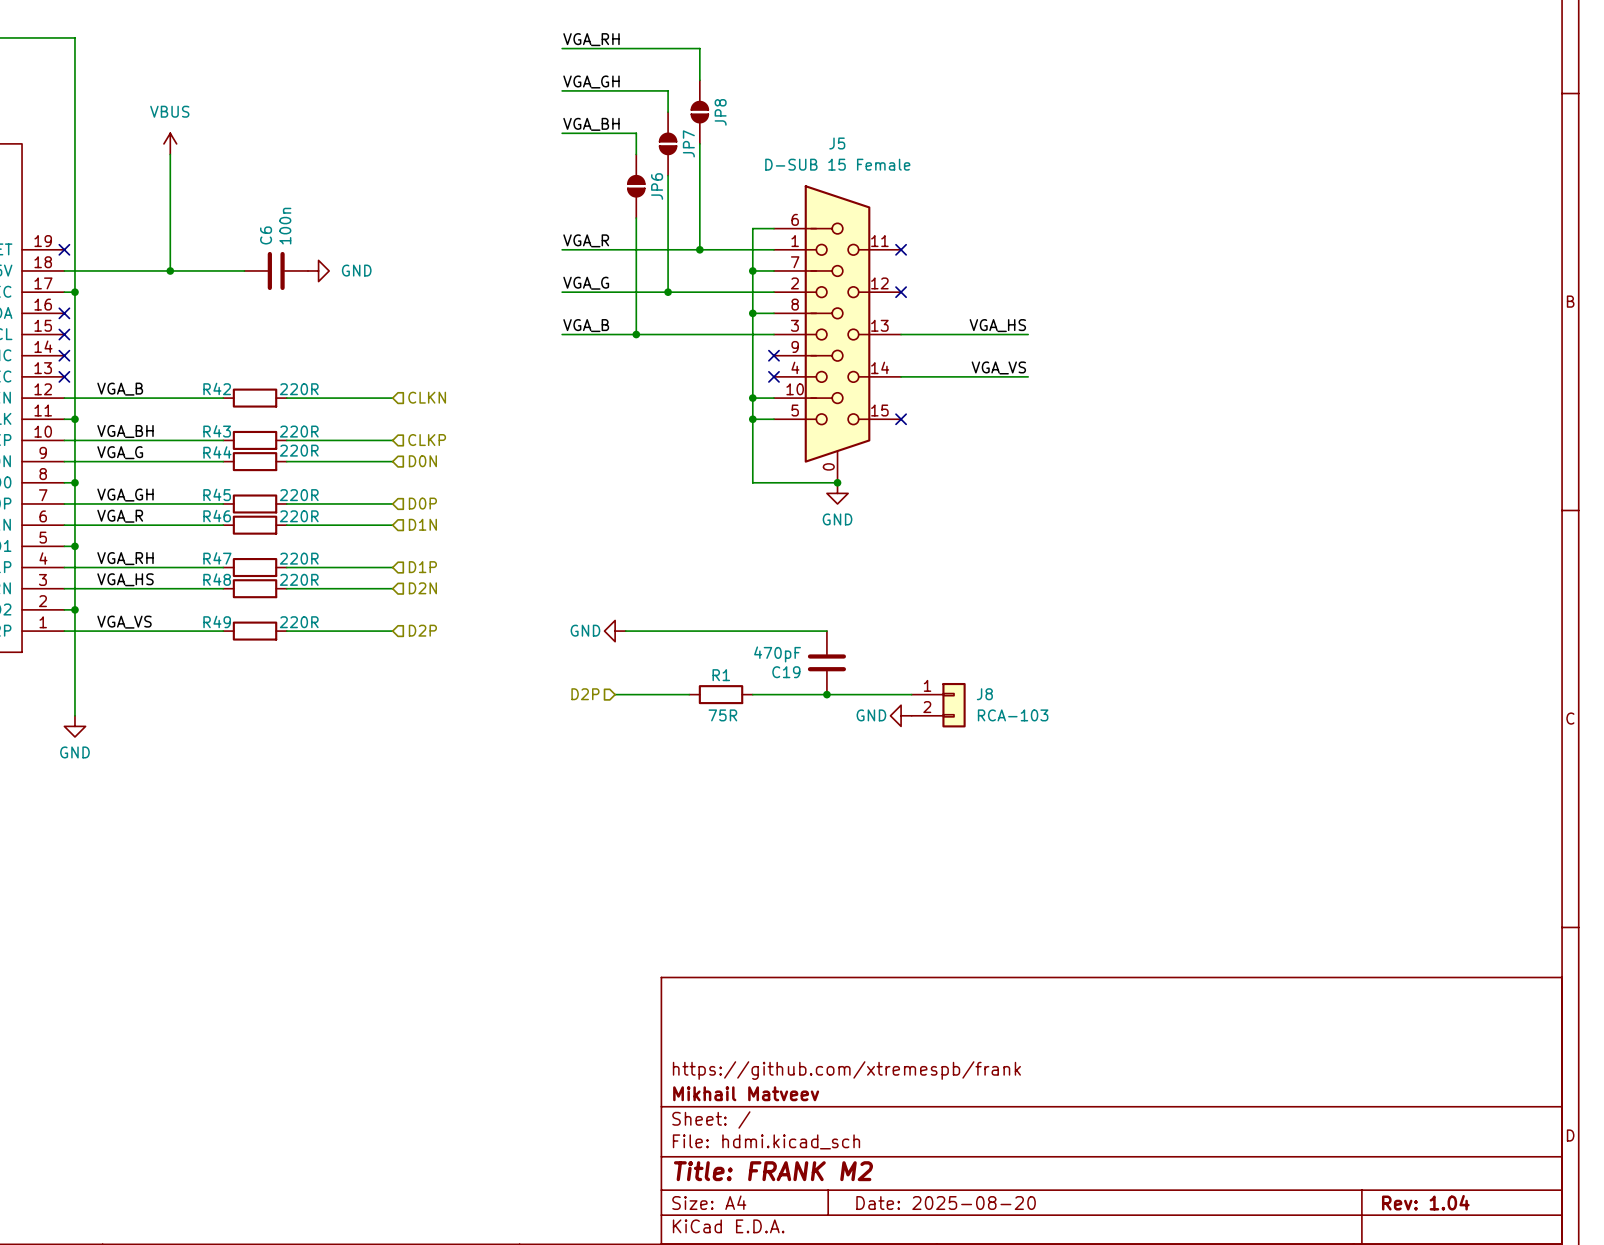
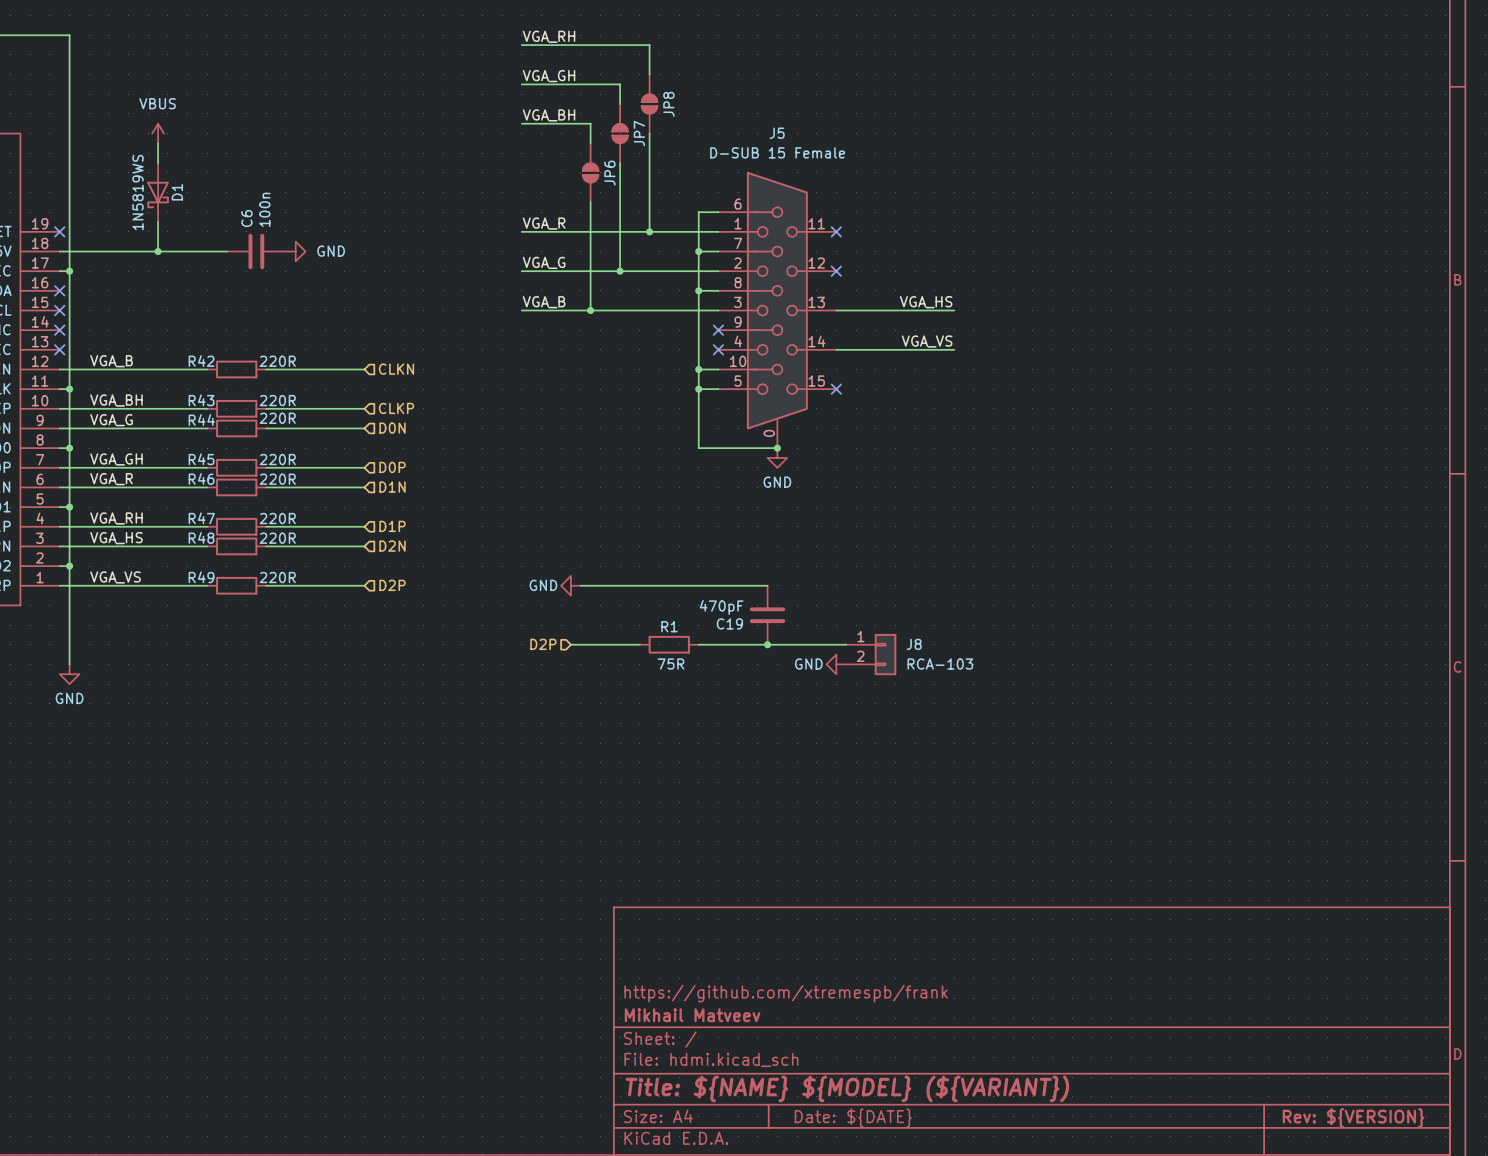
D1: none -> 1N5819WS (158, 192)
title block: Title: FRANK M2 (773, 1171) -> Title: ${NAME} ${MODEL} (${VARIANT}) (847, 1088)
title block: Rev: 1.04 (1425, 1202) -> Rev: ${VERSION} (1353, 1118)
title block: Date: 2025-08-20 (946, 1203) -> Date: ${DATE} (853, 1118)

